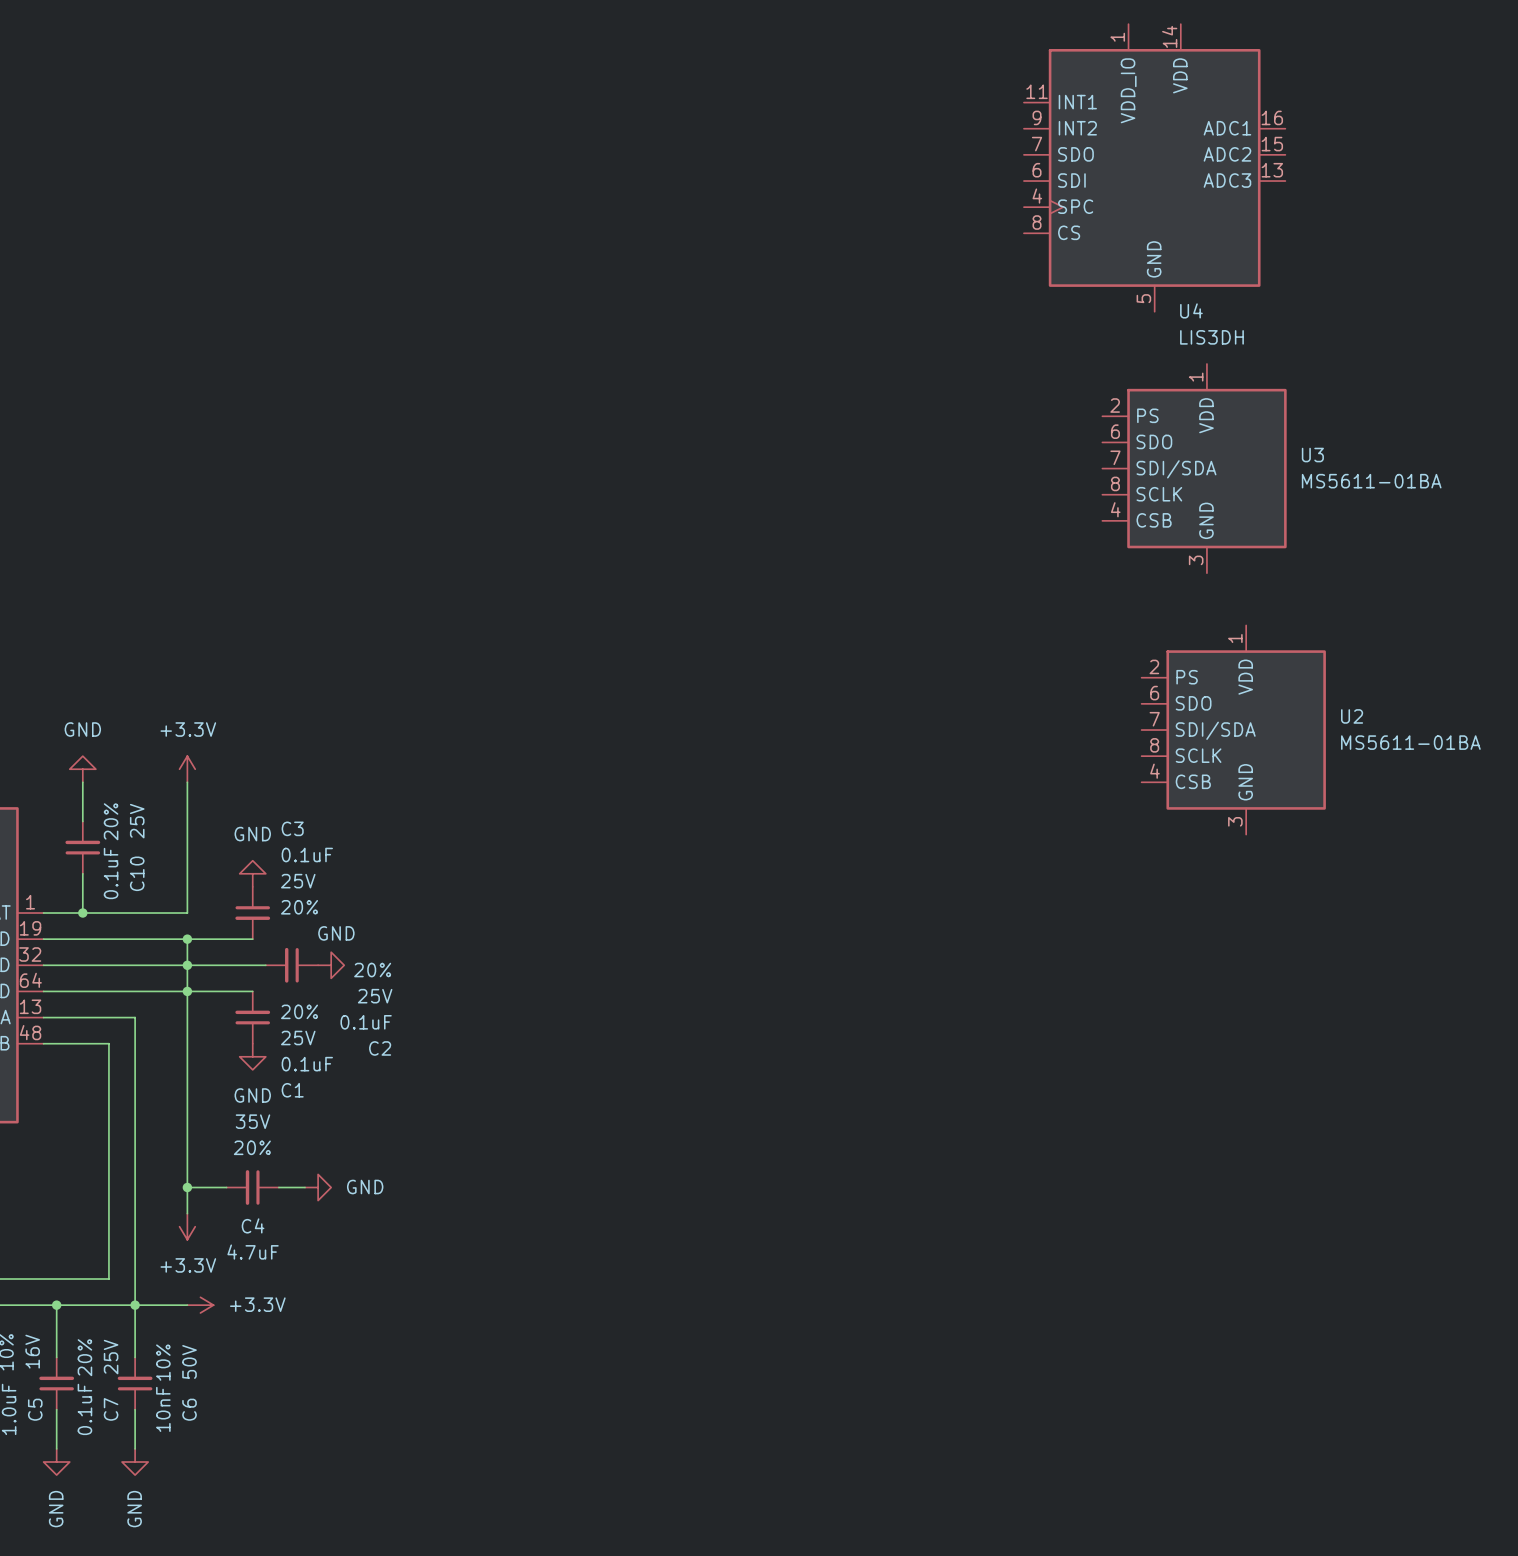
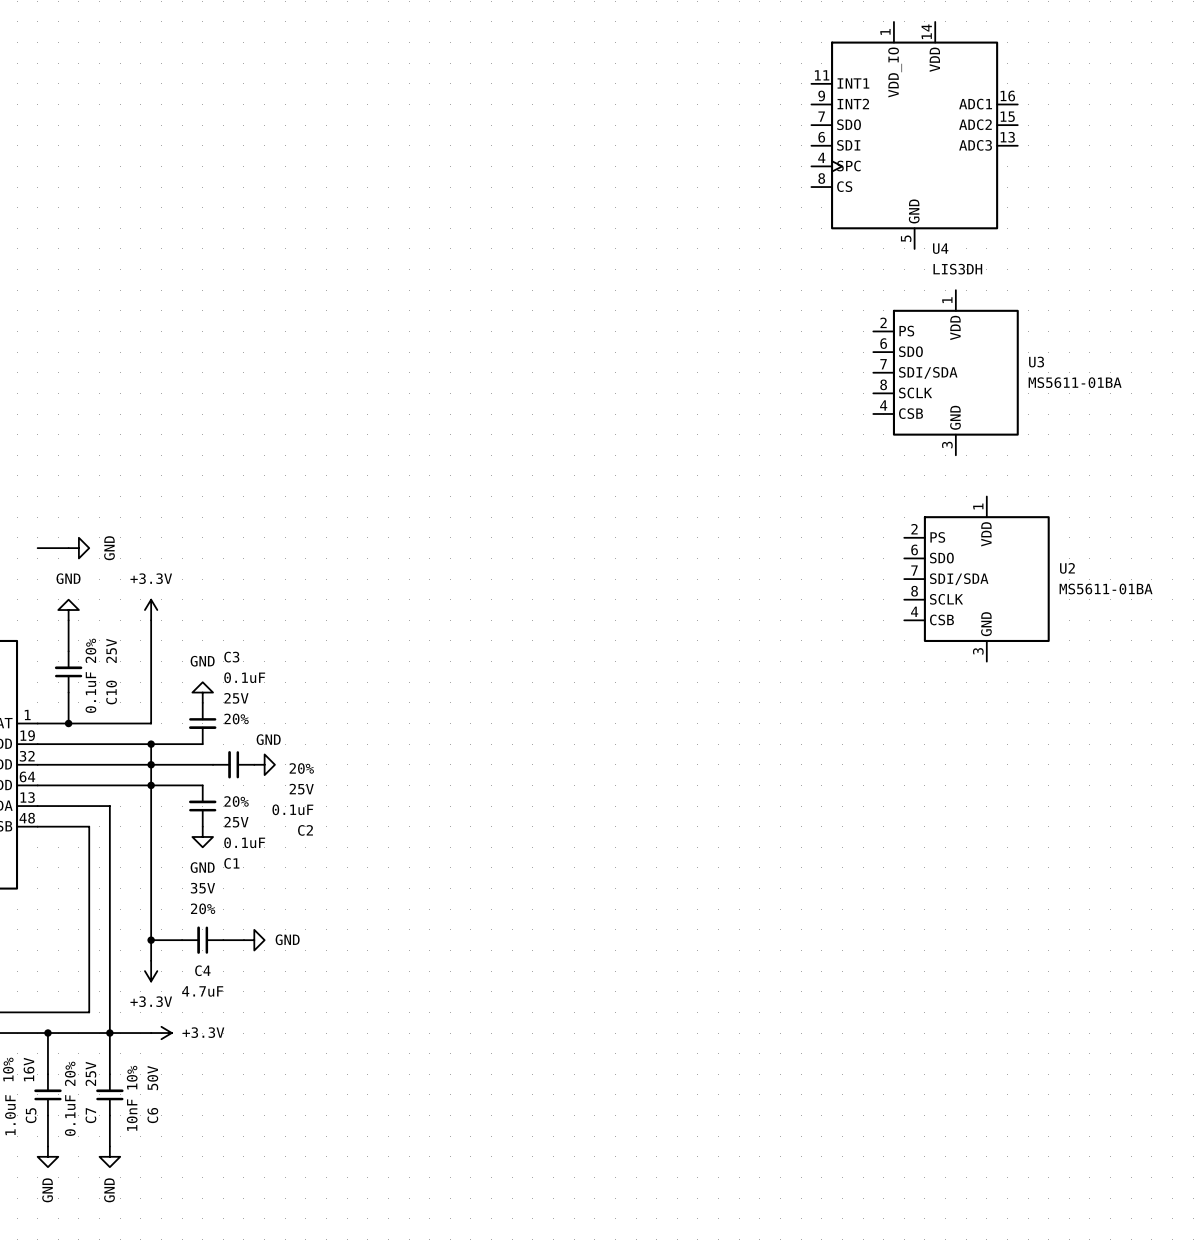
wire: none -> (37, 548) (68, 548)
power symbol: none -> GND (78, 548)

